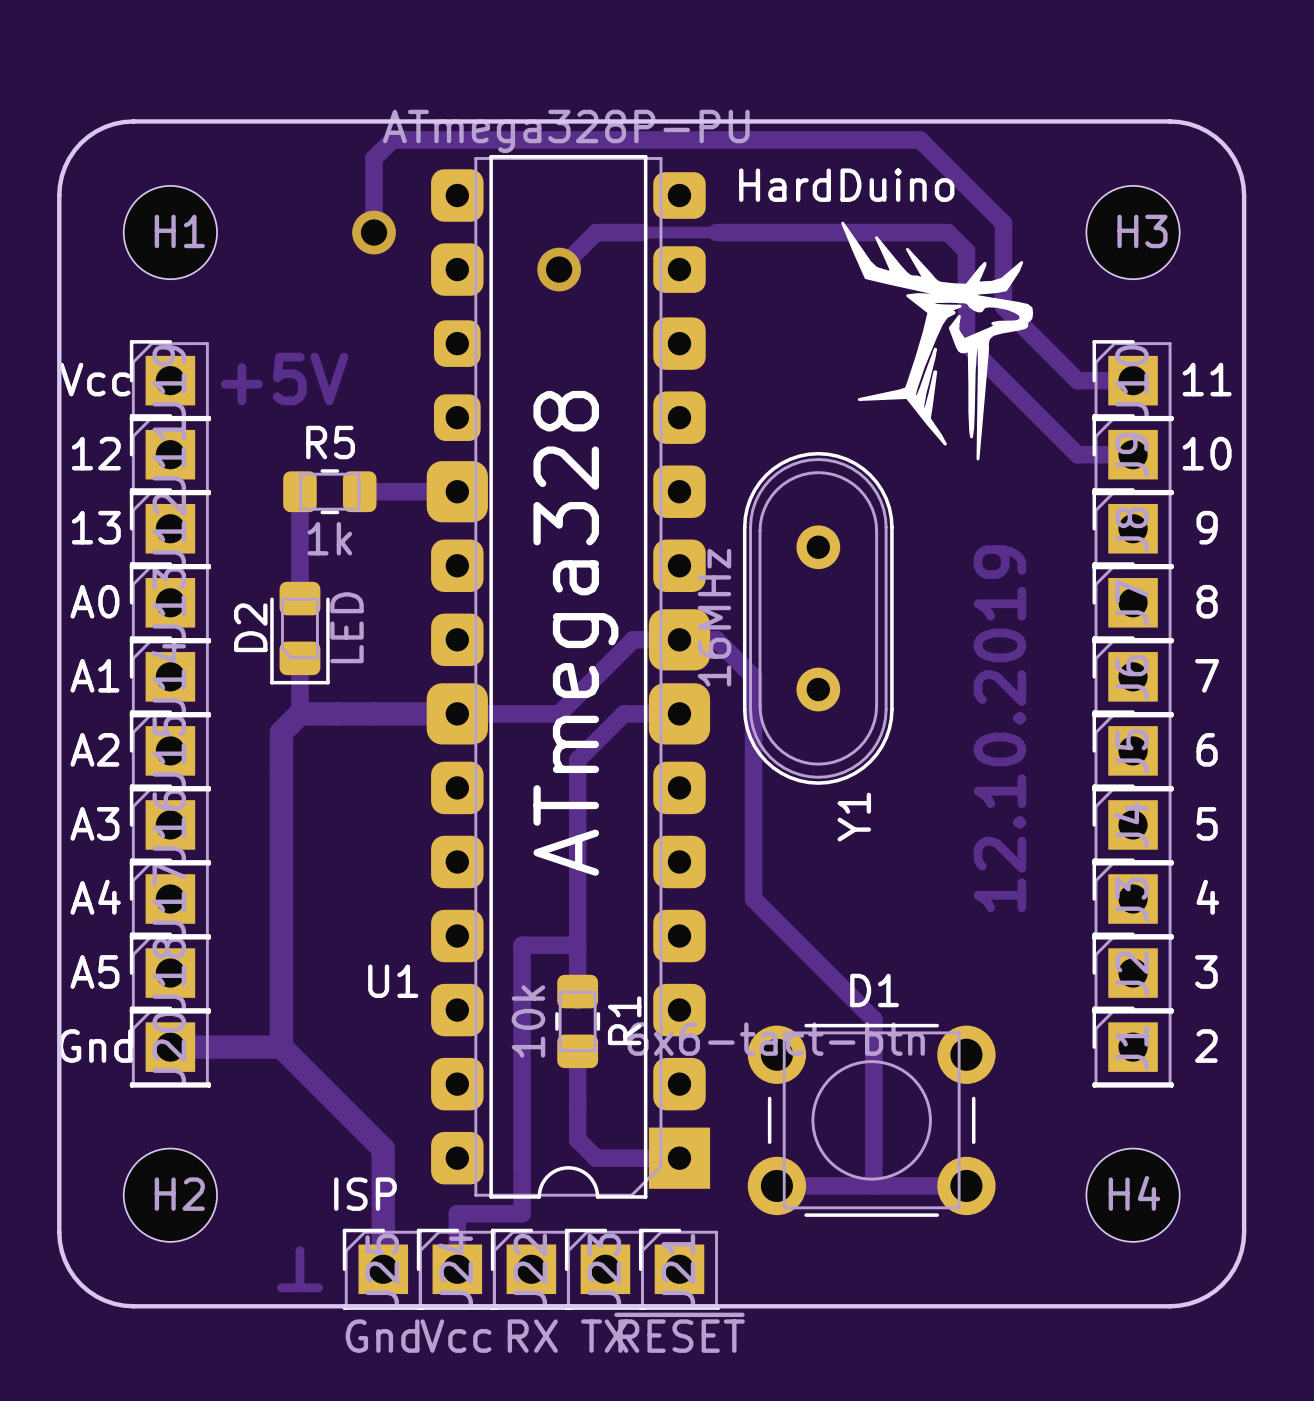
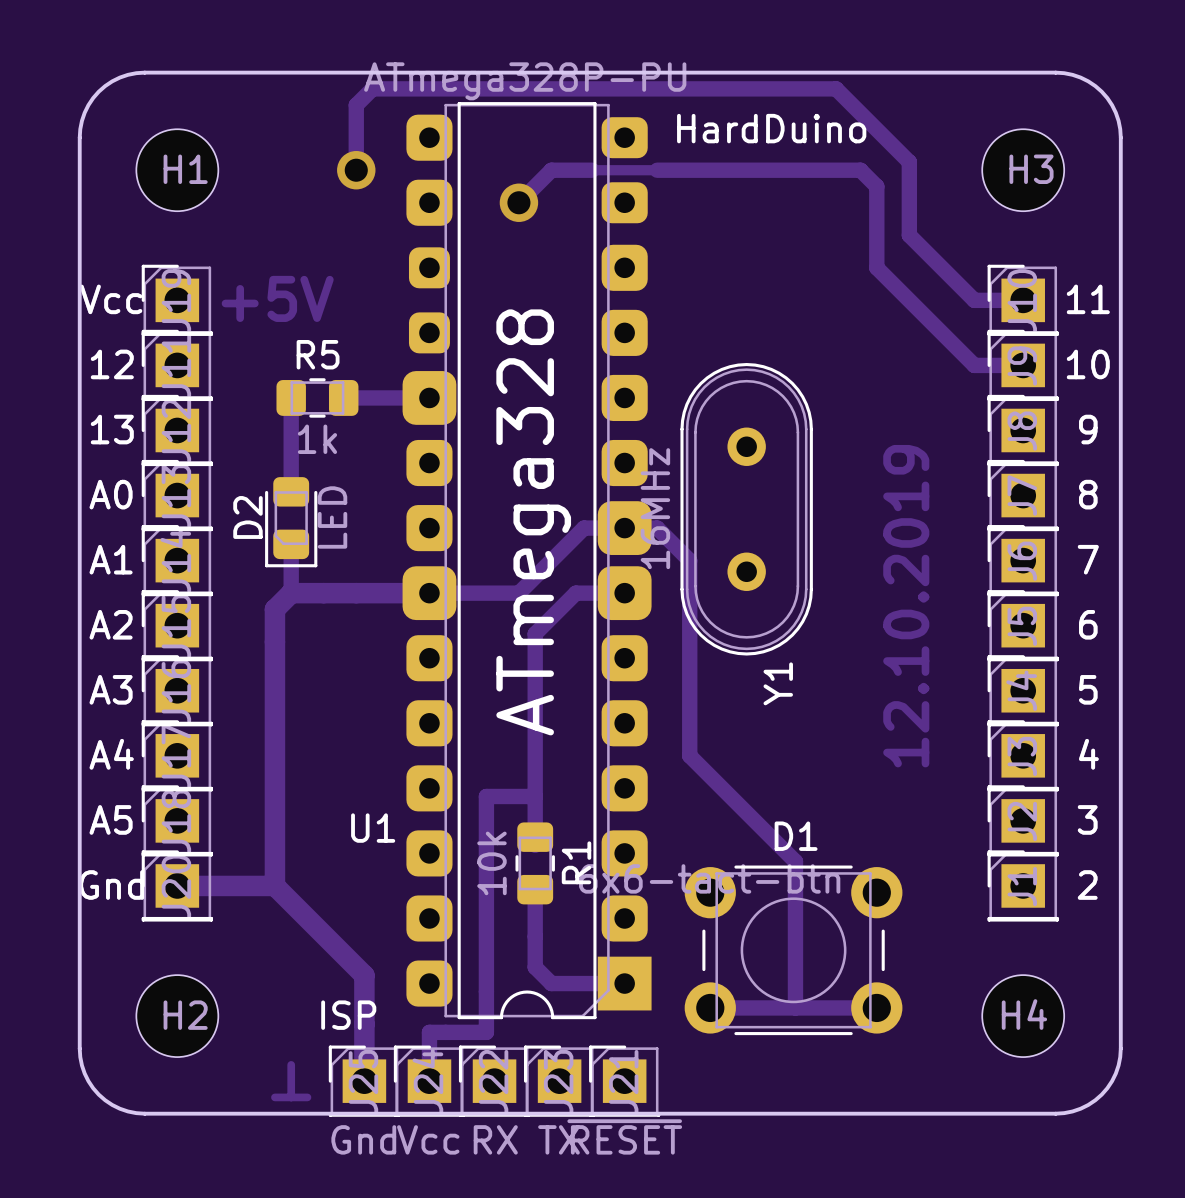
drawing: [841, 221, 1034, 461] -> none

